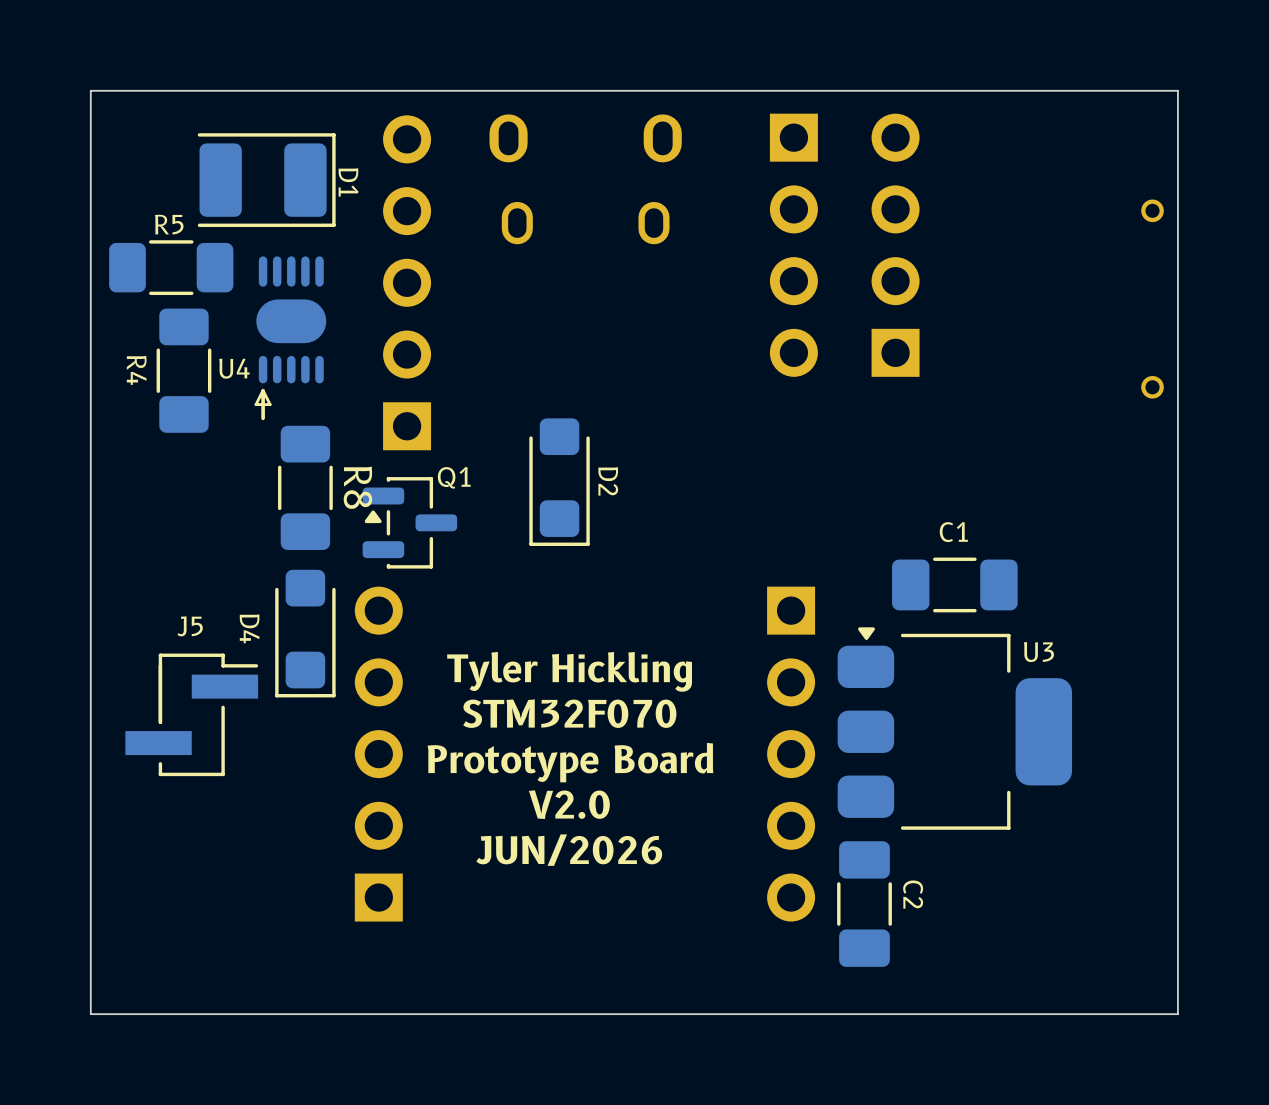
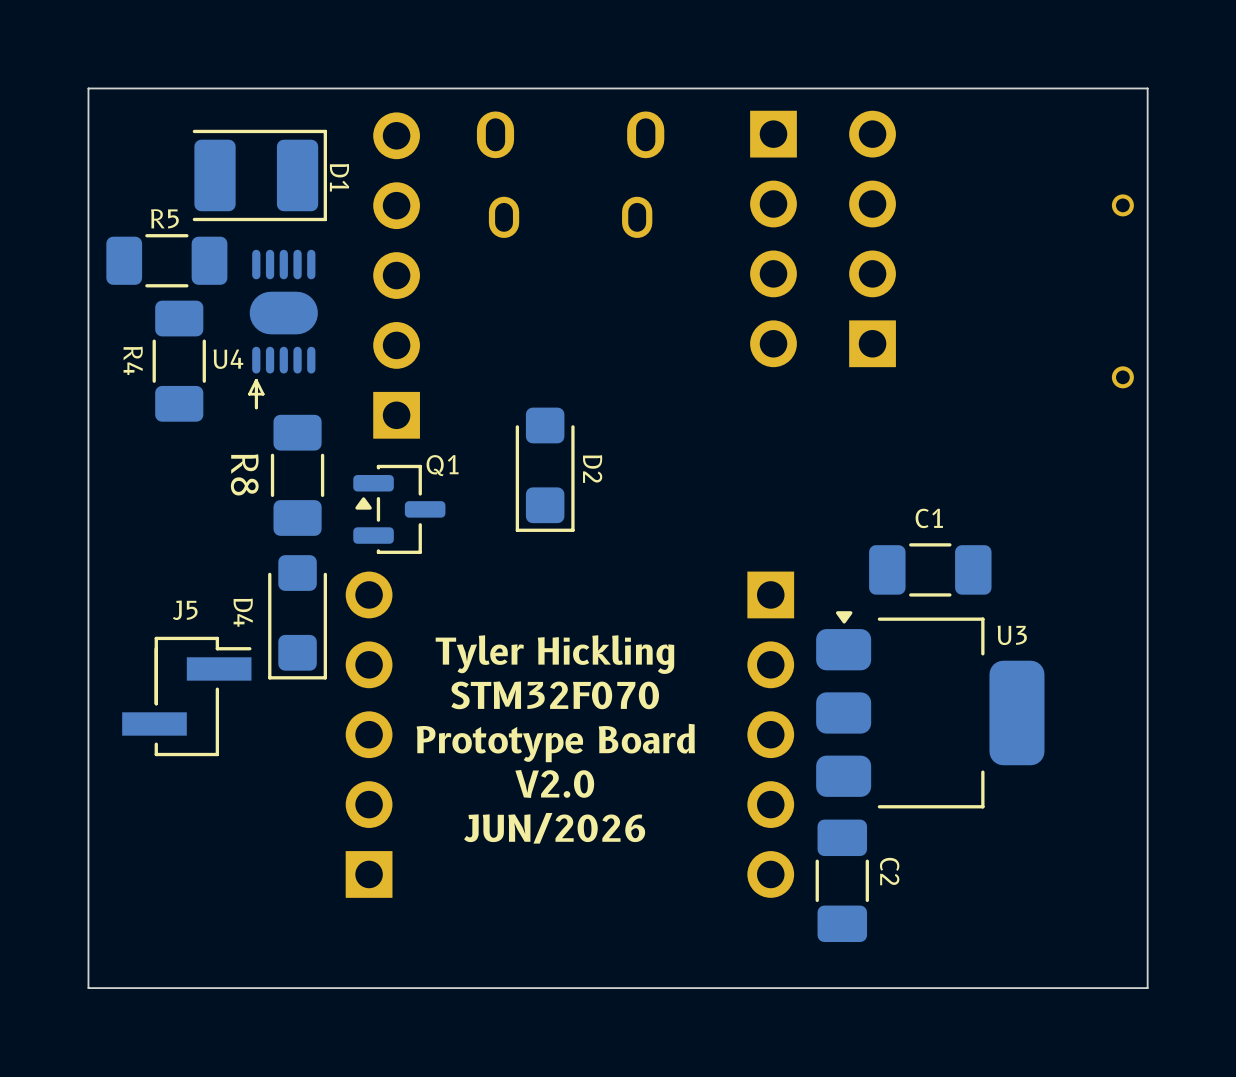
R8 name position: R8 (357, 487) -> R8 (244, 474)

